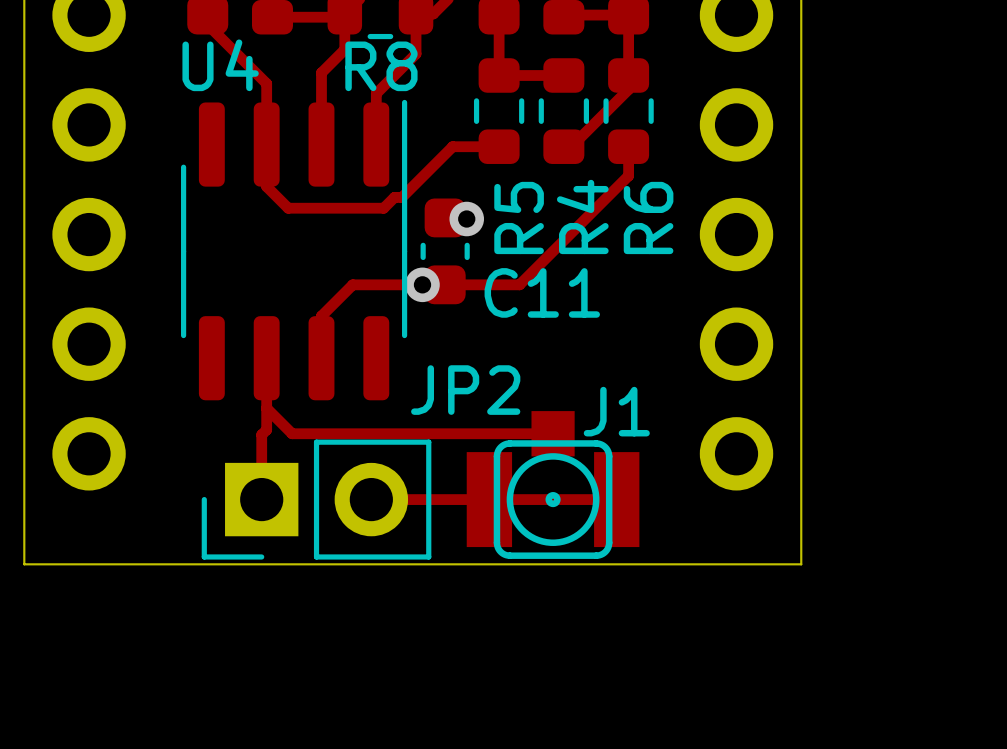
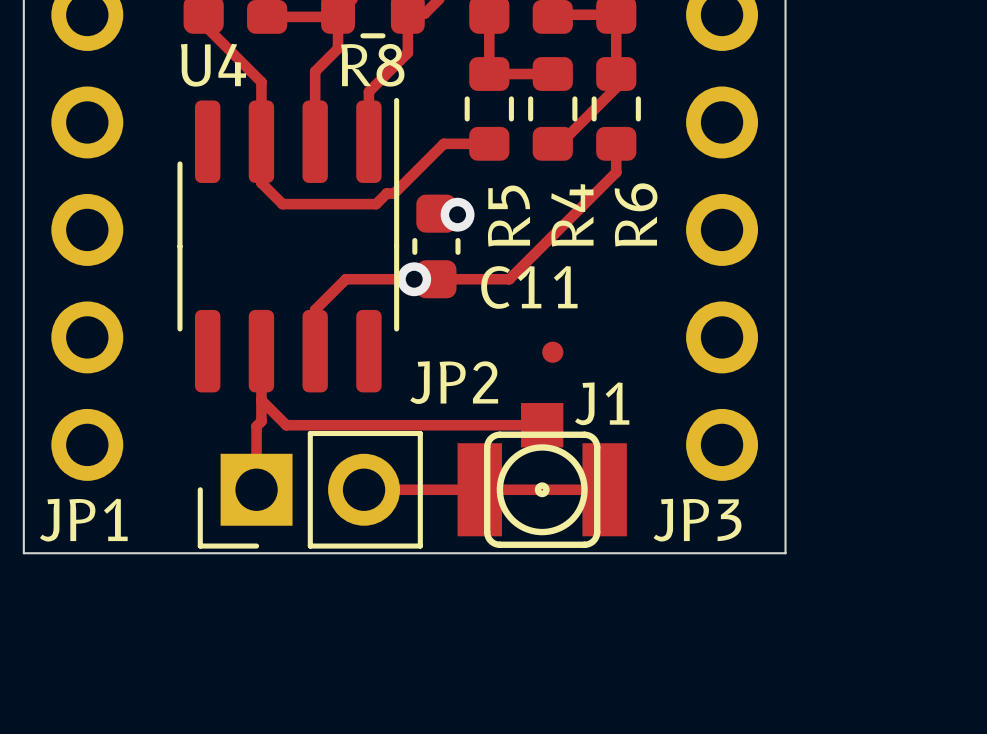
part: none -> (552, 352)
JP1 name: none -> JP1 (83, 520)
JP3 name: none -> JP3 (697, 520)

